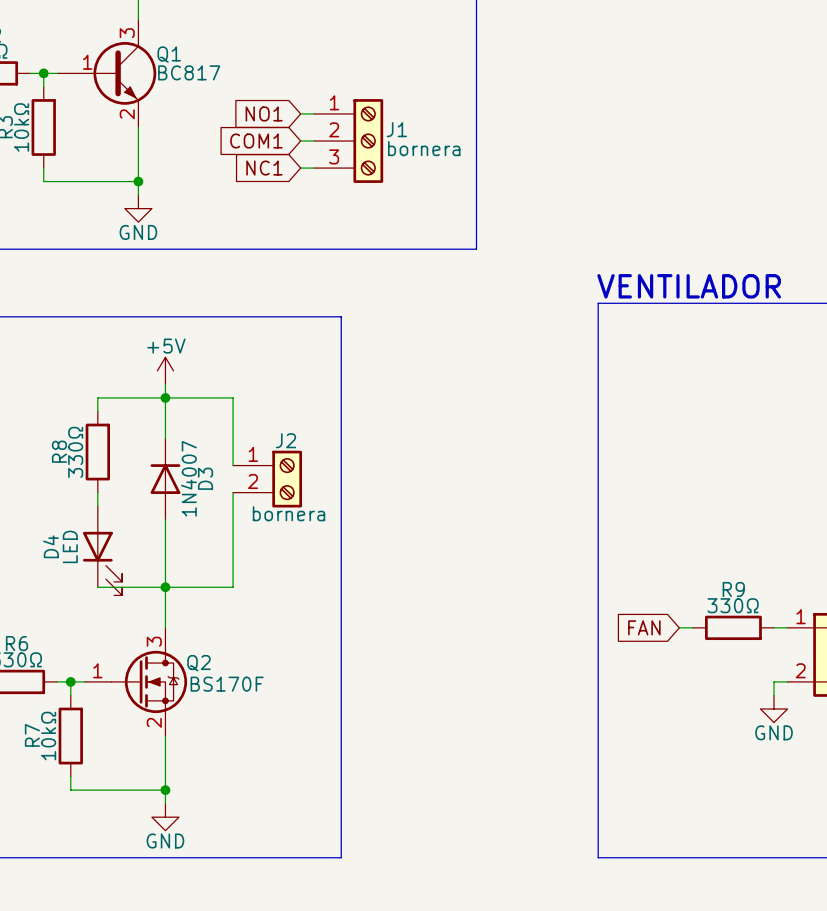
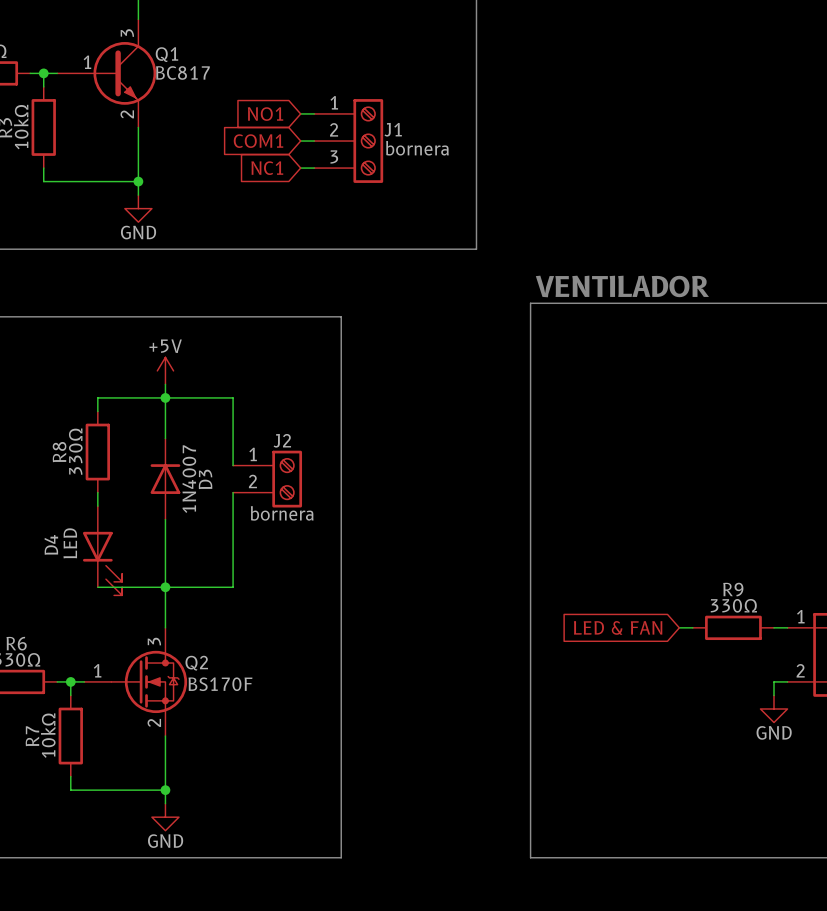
text position: VENTILADOR (689, 286) -> VENTILADOR (622, 286)
bus: (598, 303) (598, 857) -> (598, 303) (530, 303) (530, 857) (598, 857)
global label: FAN (644, 627) -> LED & FAN (618, 627)

